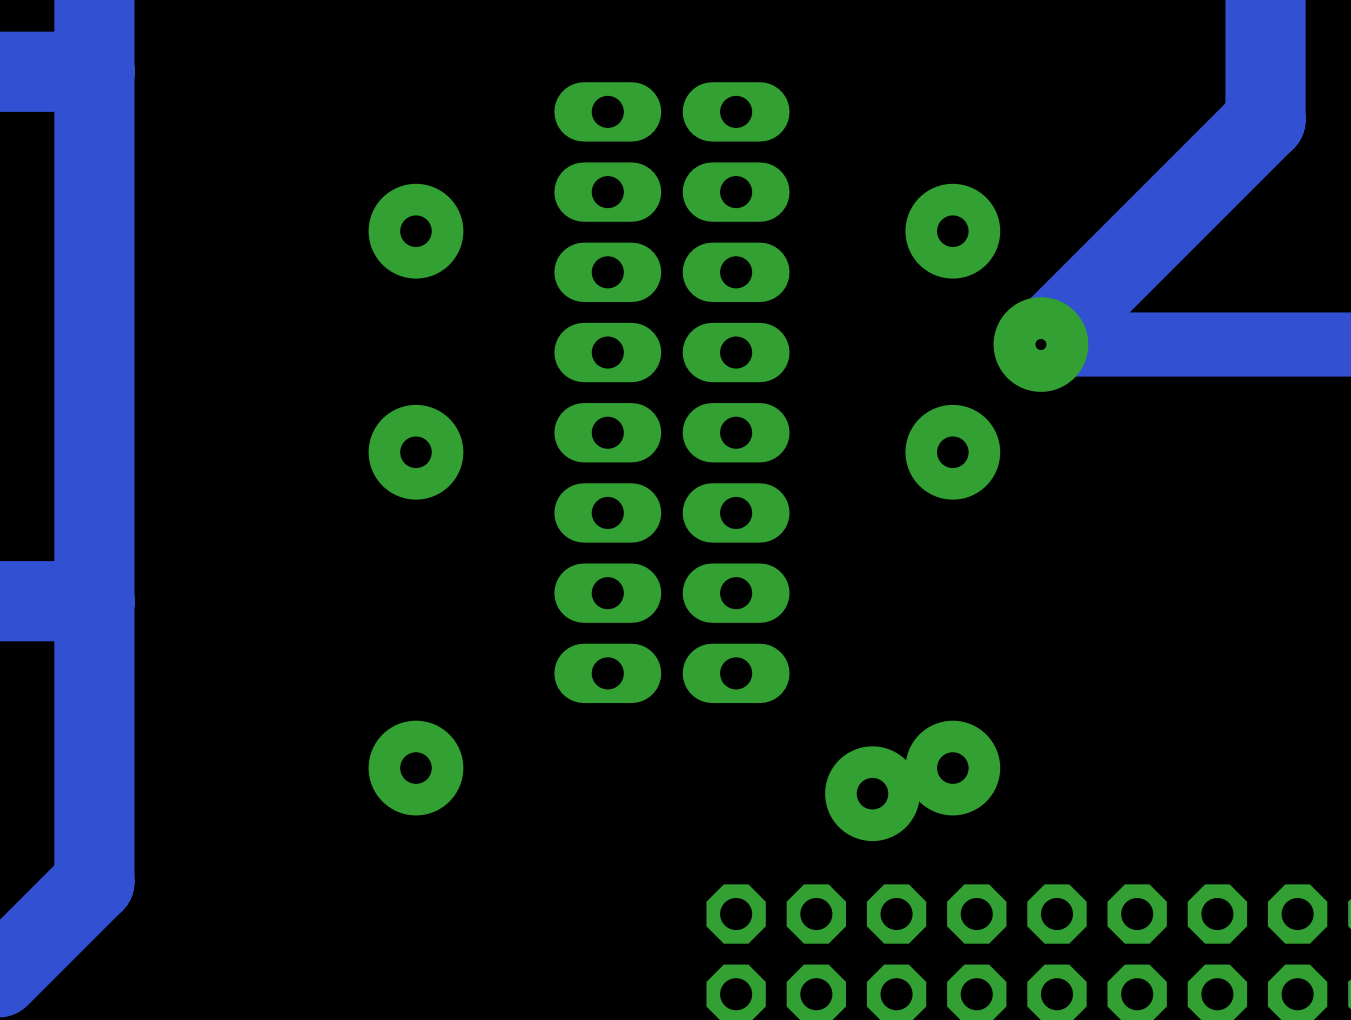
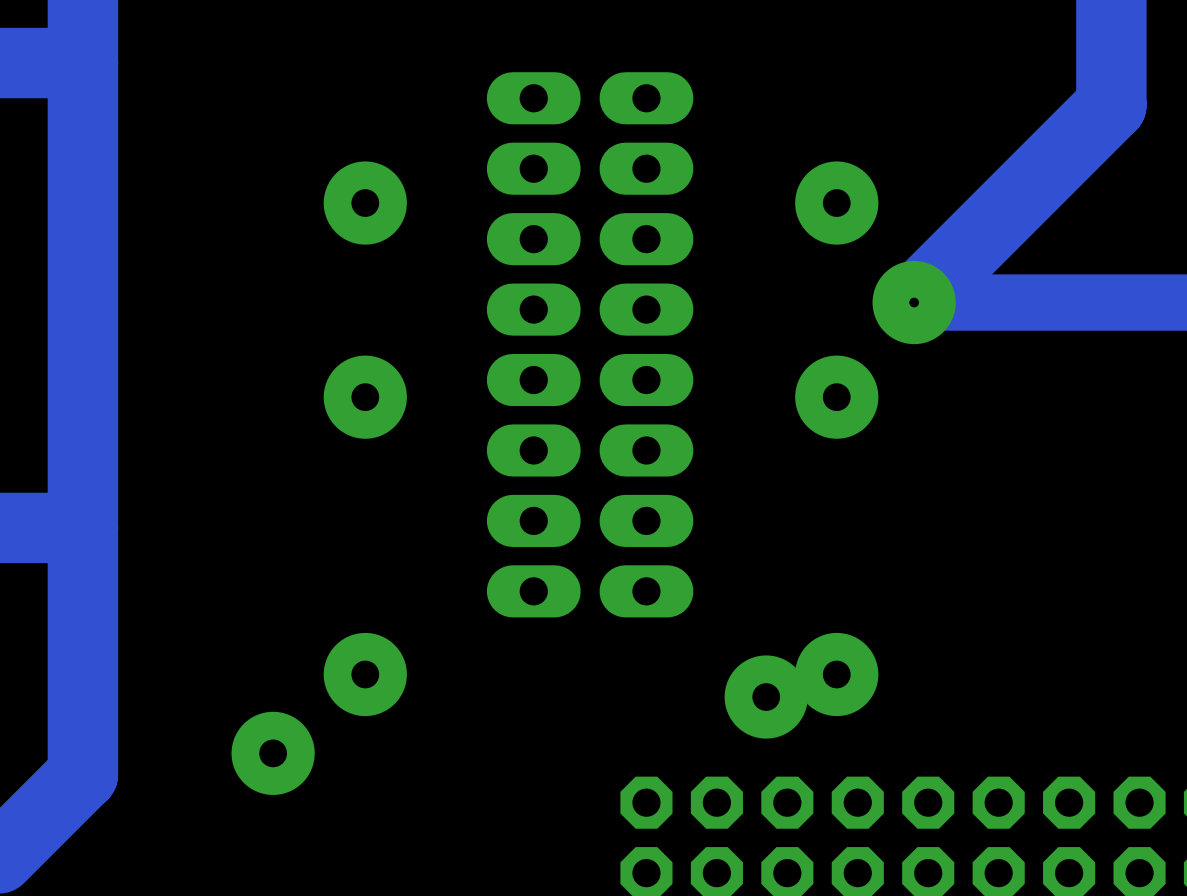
via: none -> (273, 753)

